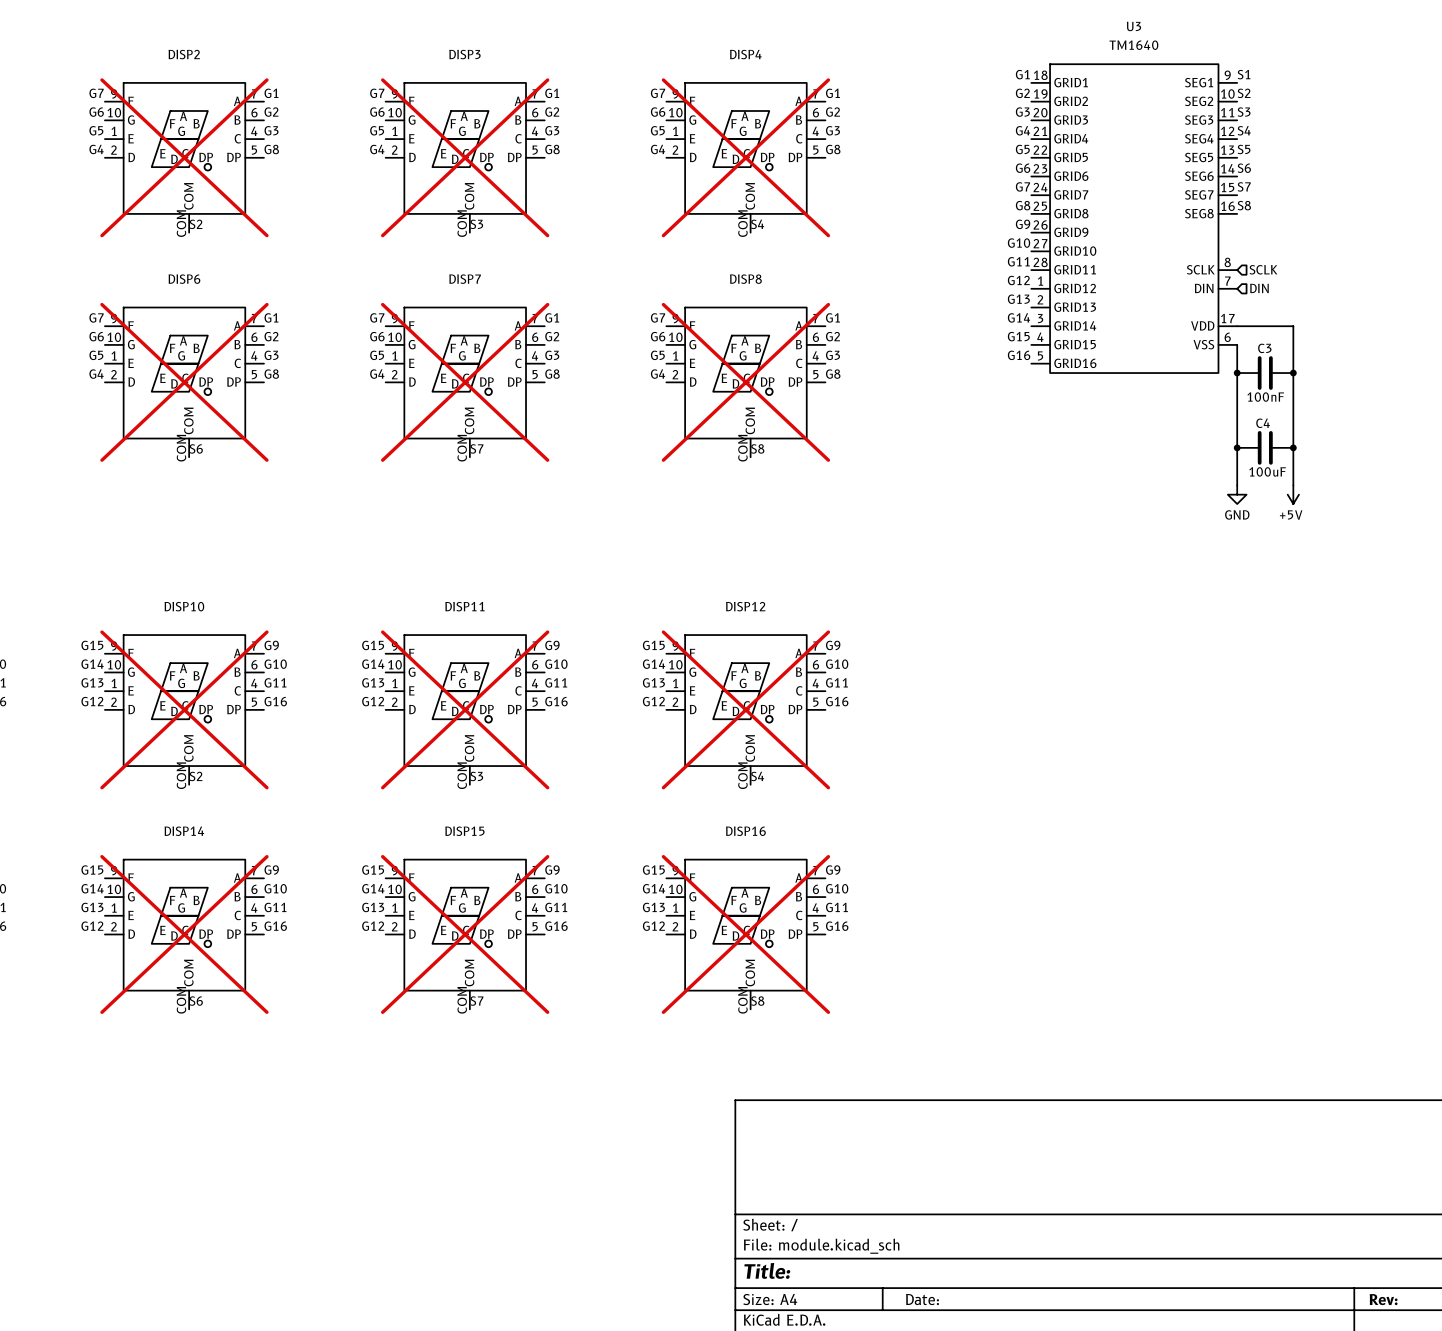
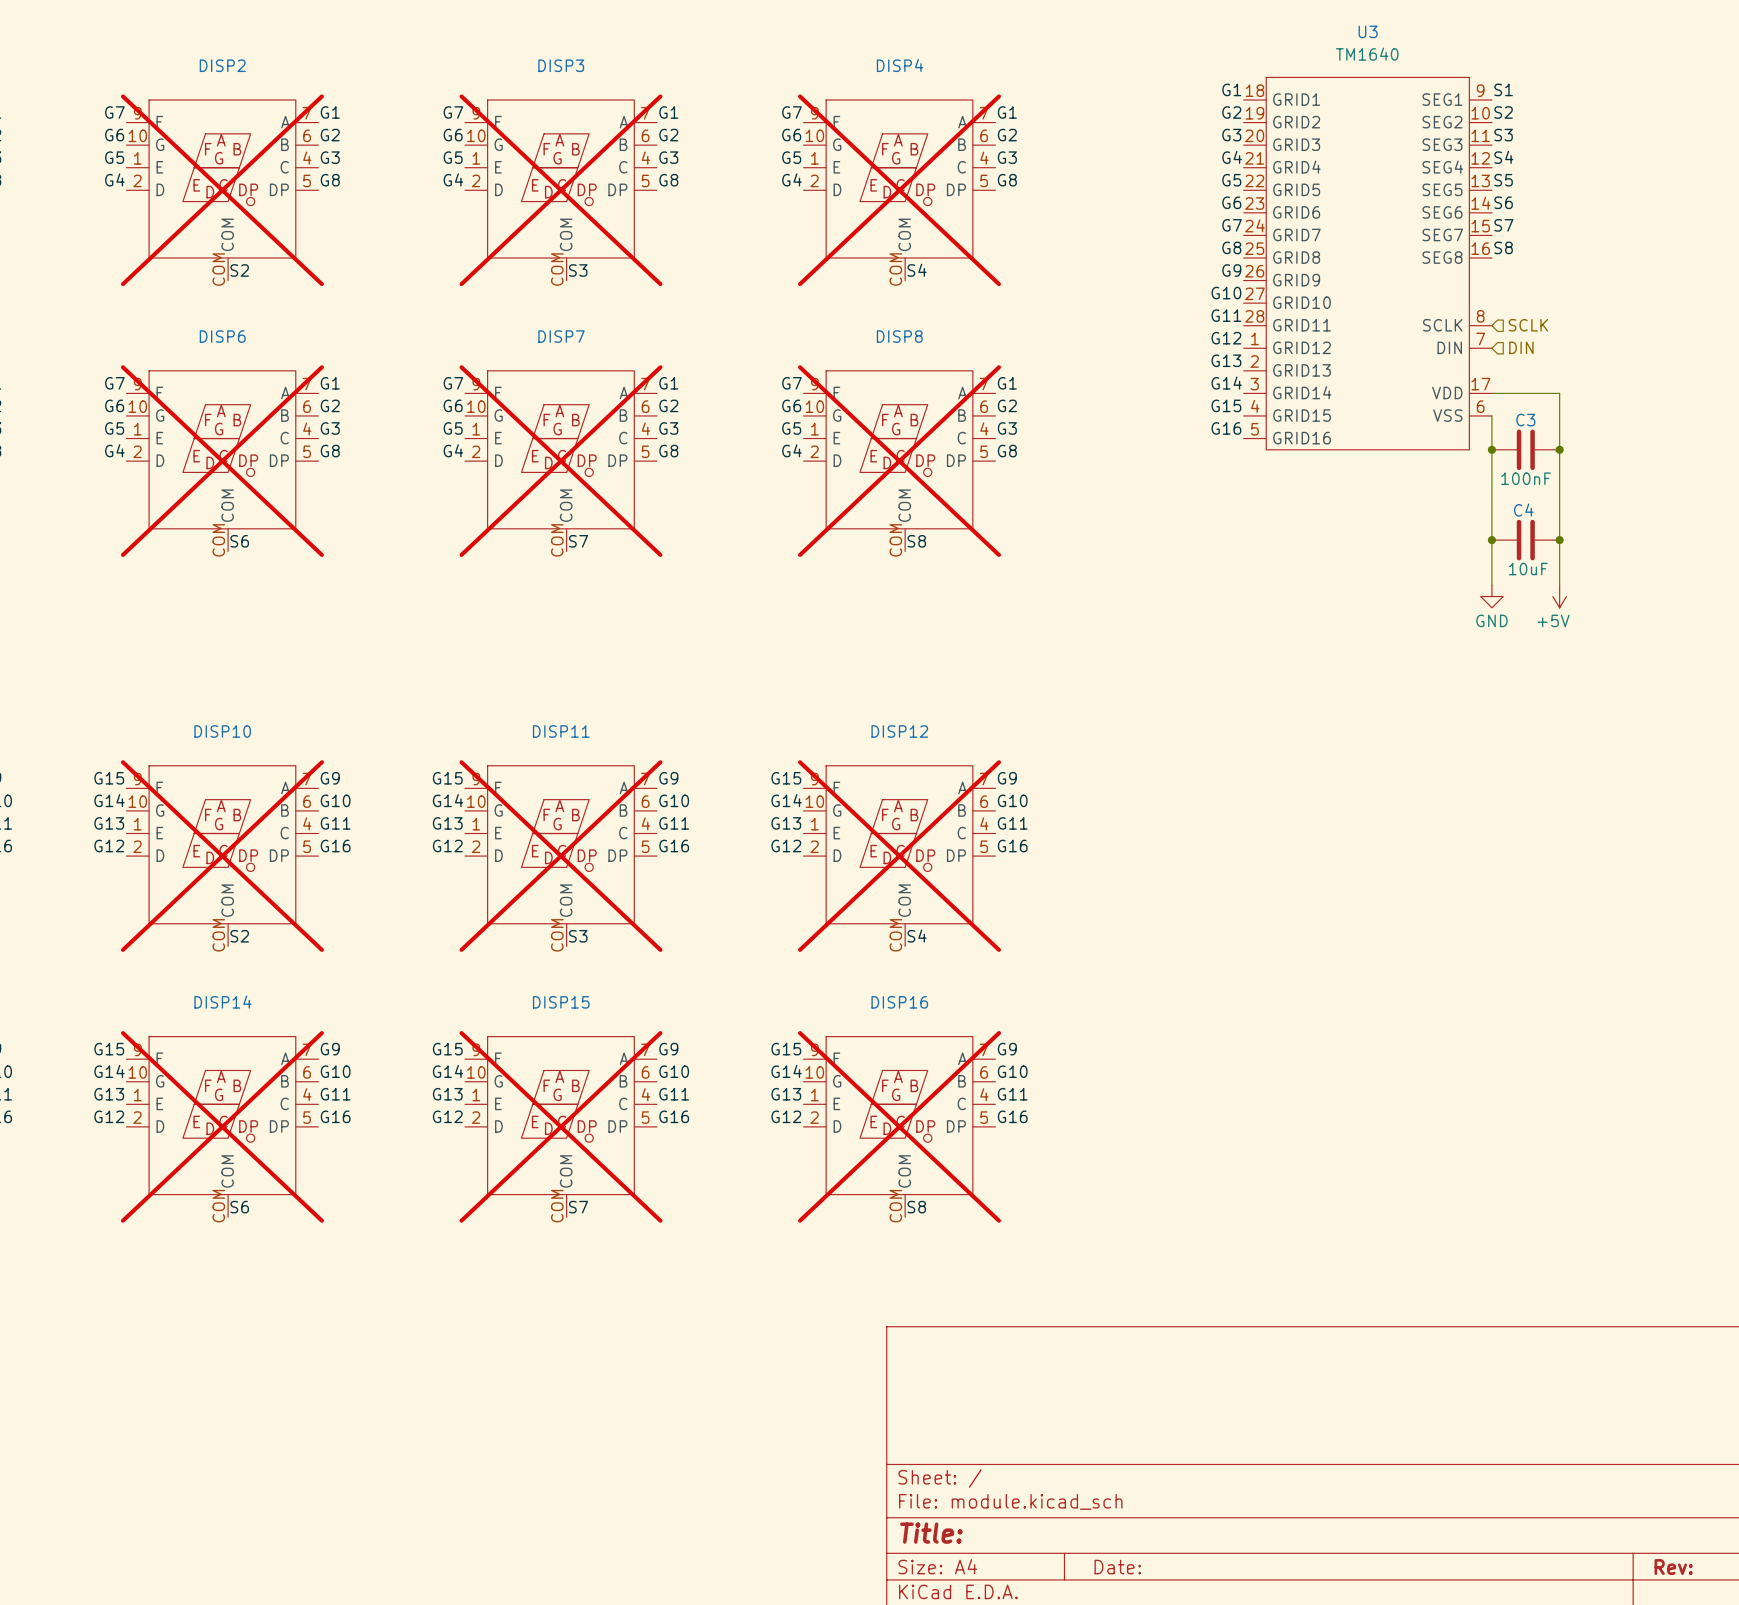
C4 value: 100uF (1267, 471) -> 10uF (1528, 569)

